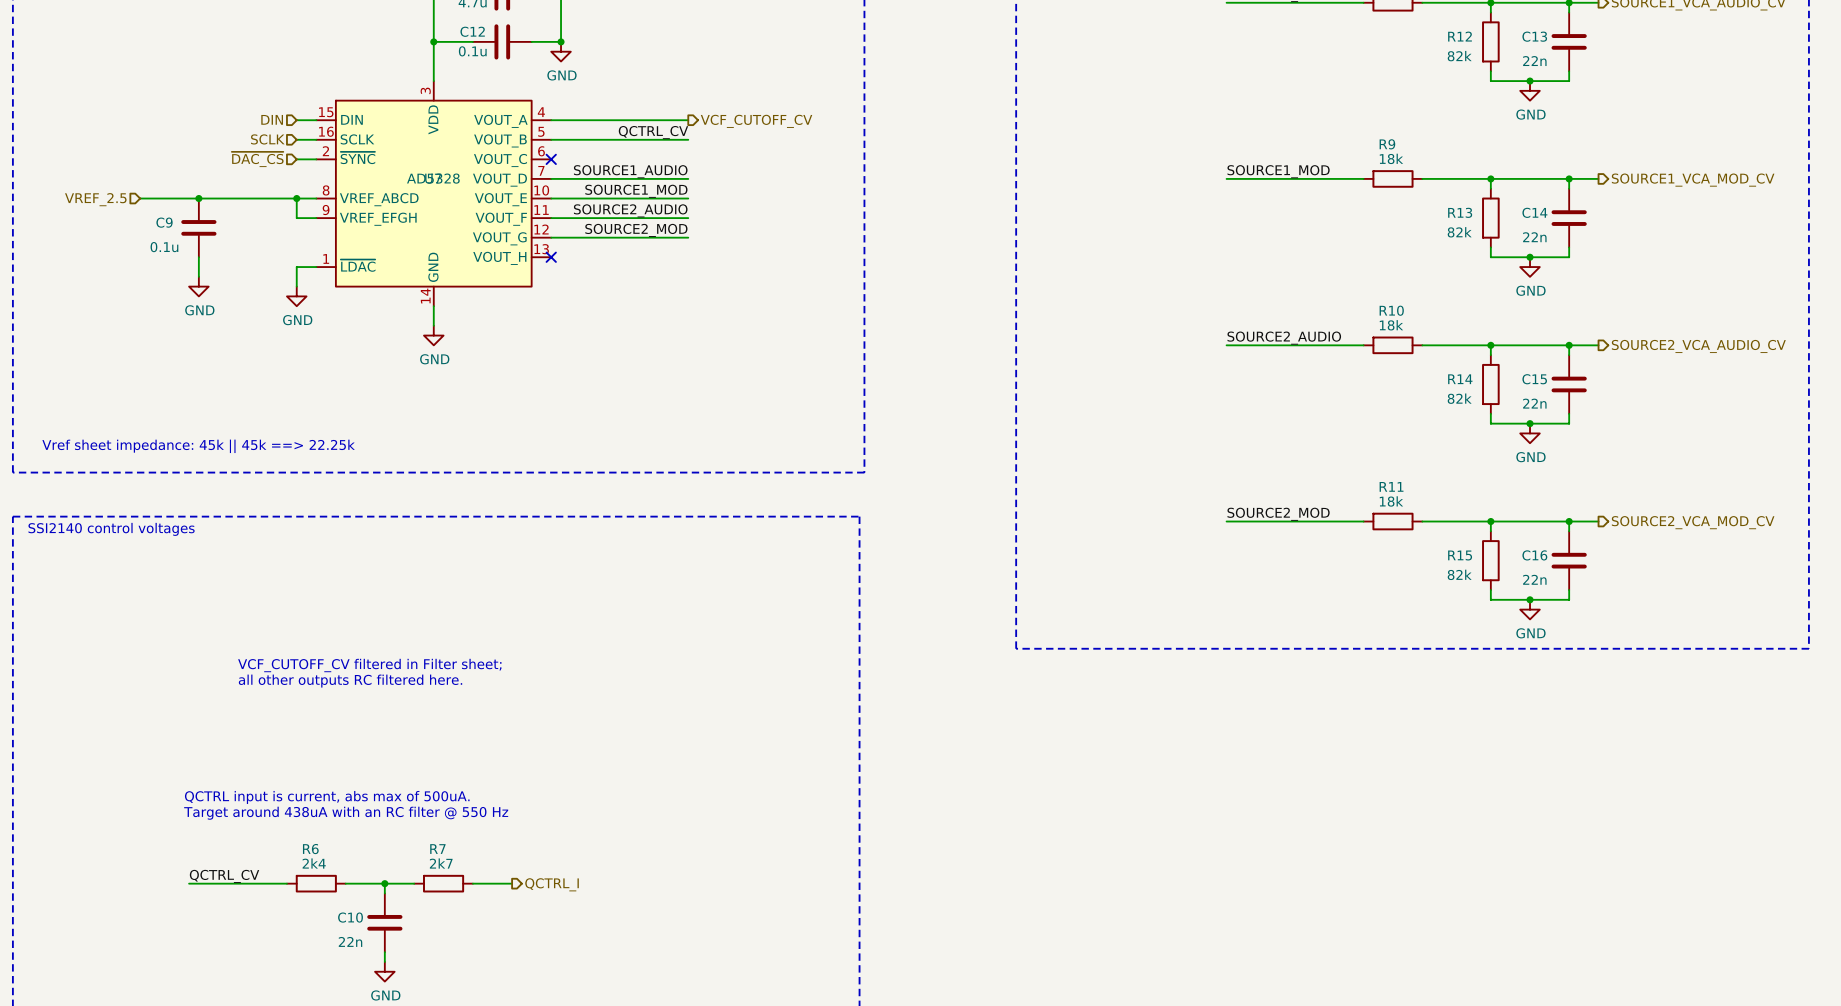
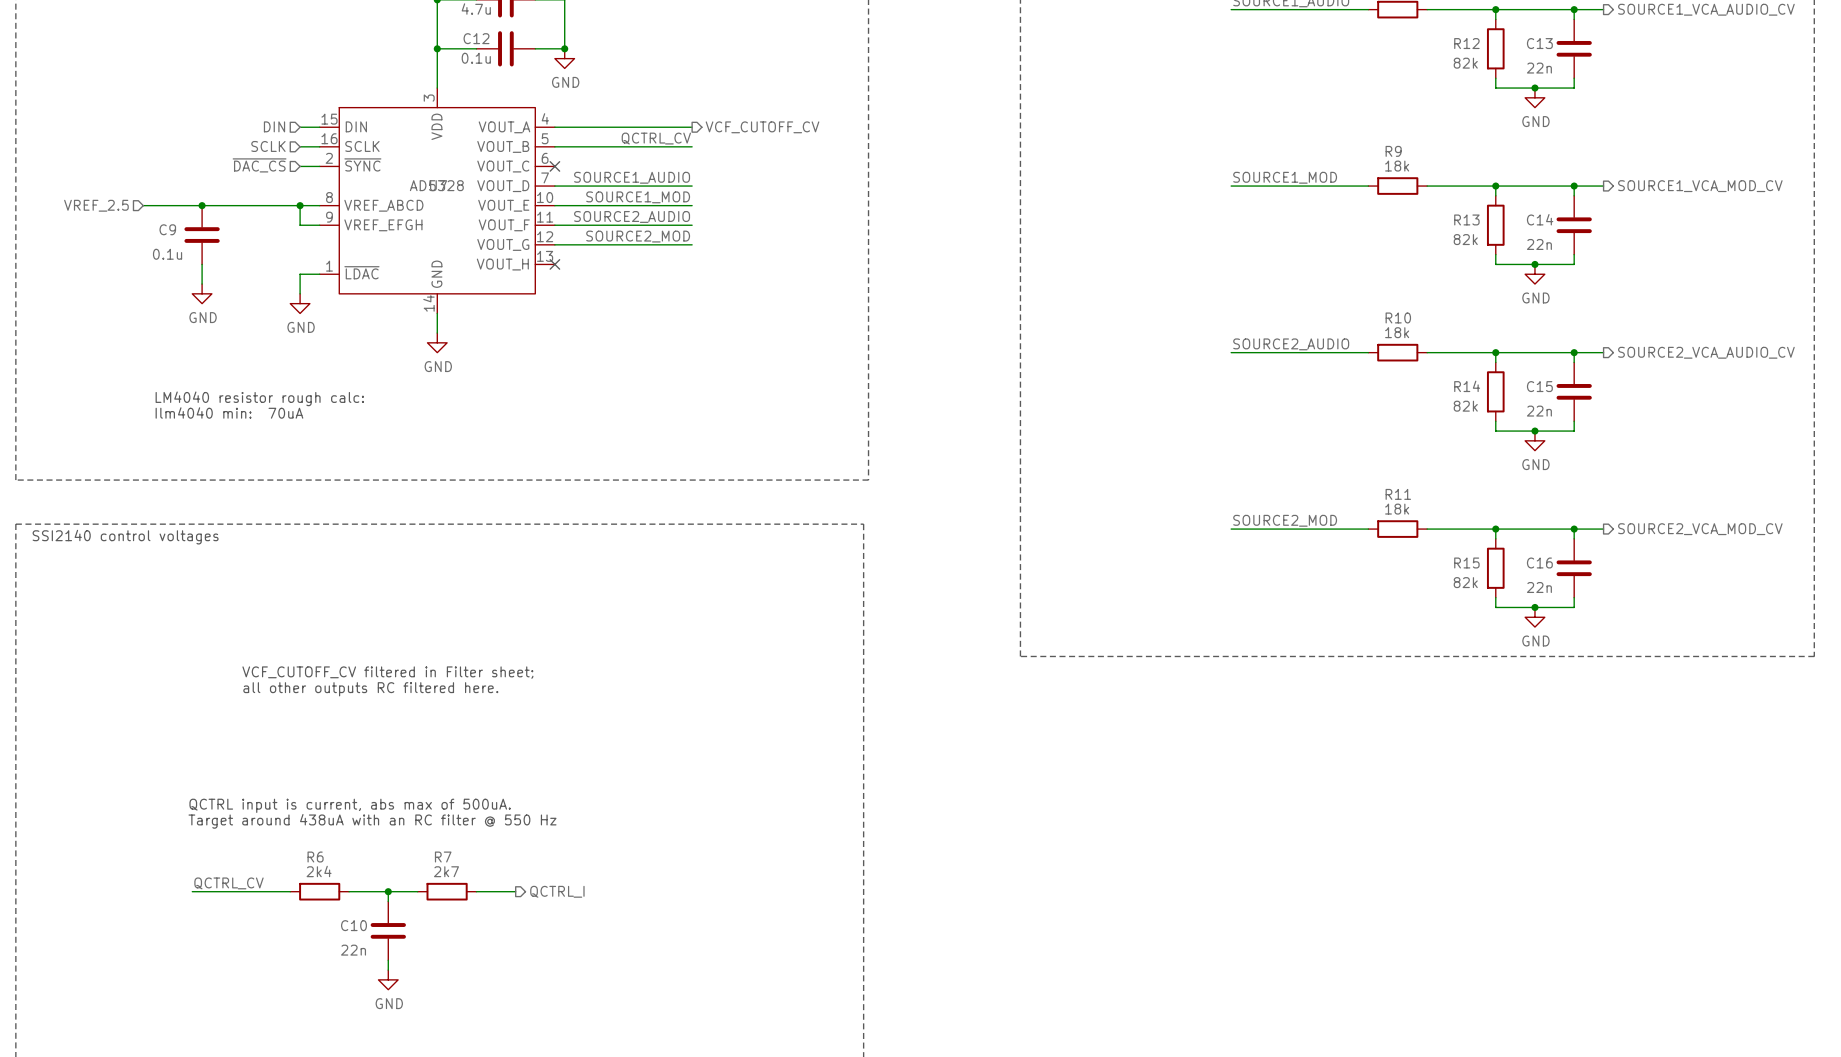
text: none -> LM4040 resistor rough calc: (259, 398)
text: none -> Ilm4040 min: 70uA (229, 412)
text: Vref sheet impedance: 45k || 45k ==> 22.25k (198, 446) -> none

